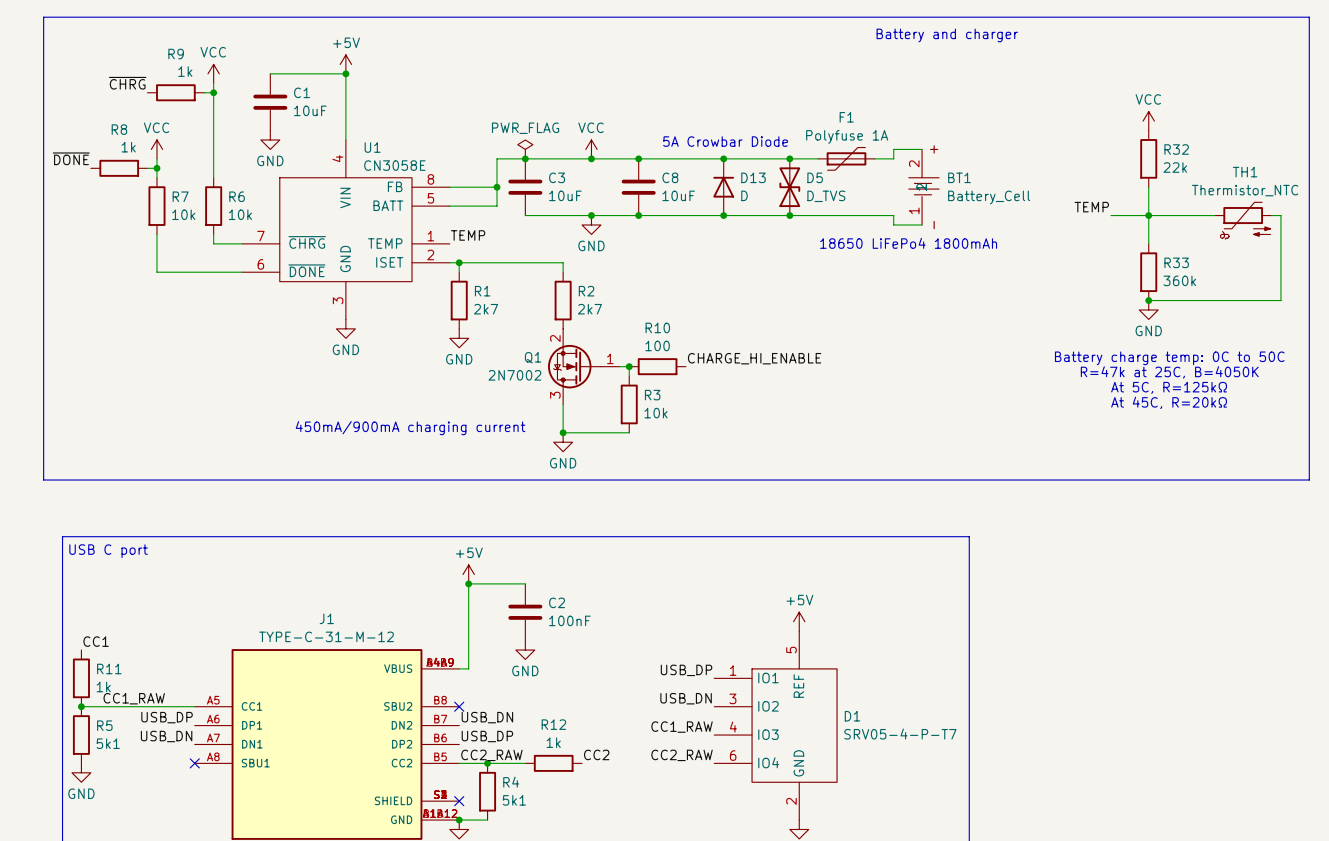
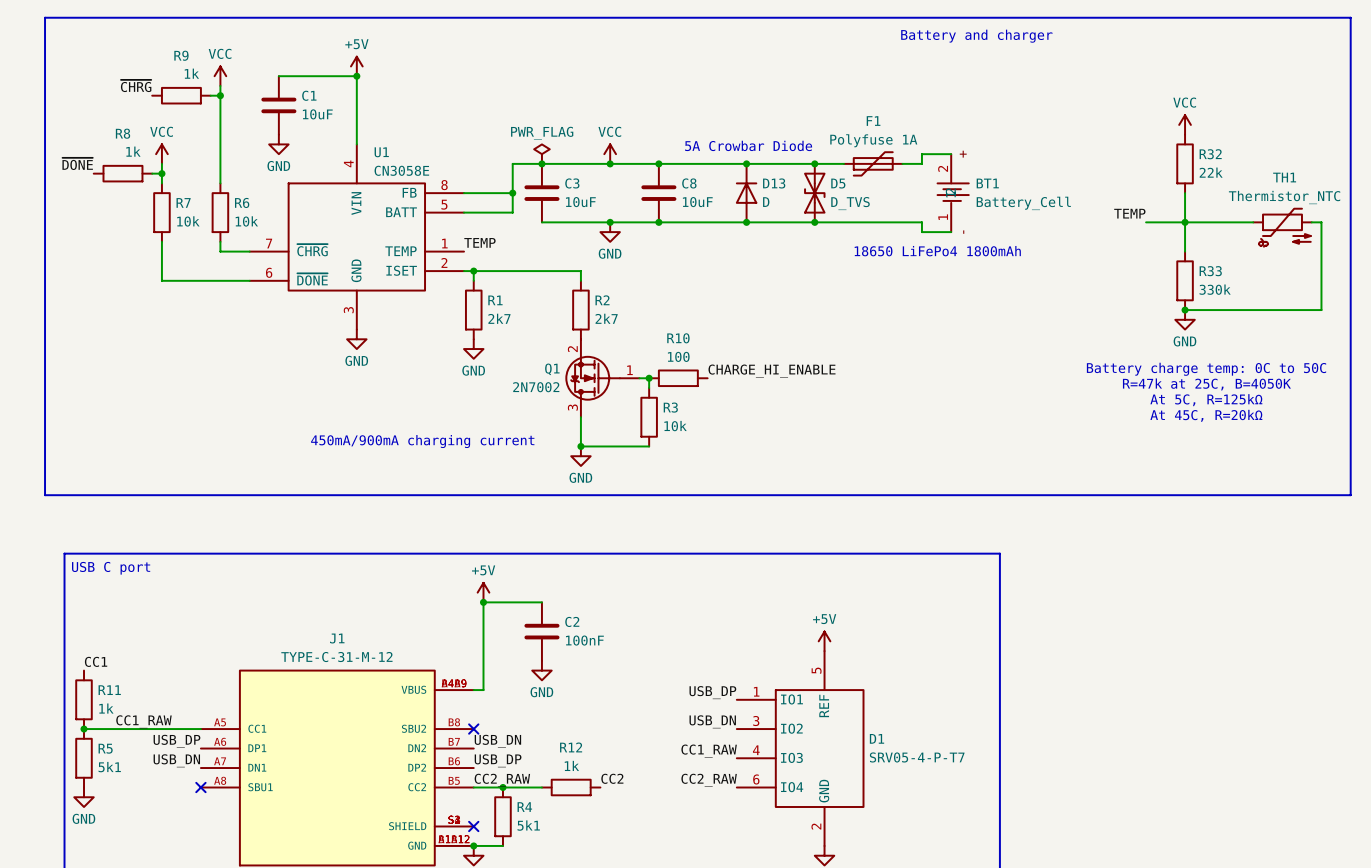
R33 value: 360k (1179, 280) -> 330k (1215, 289)

